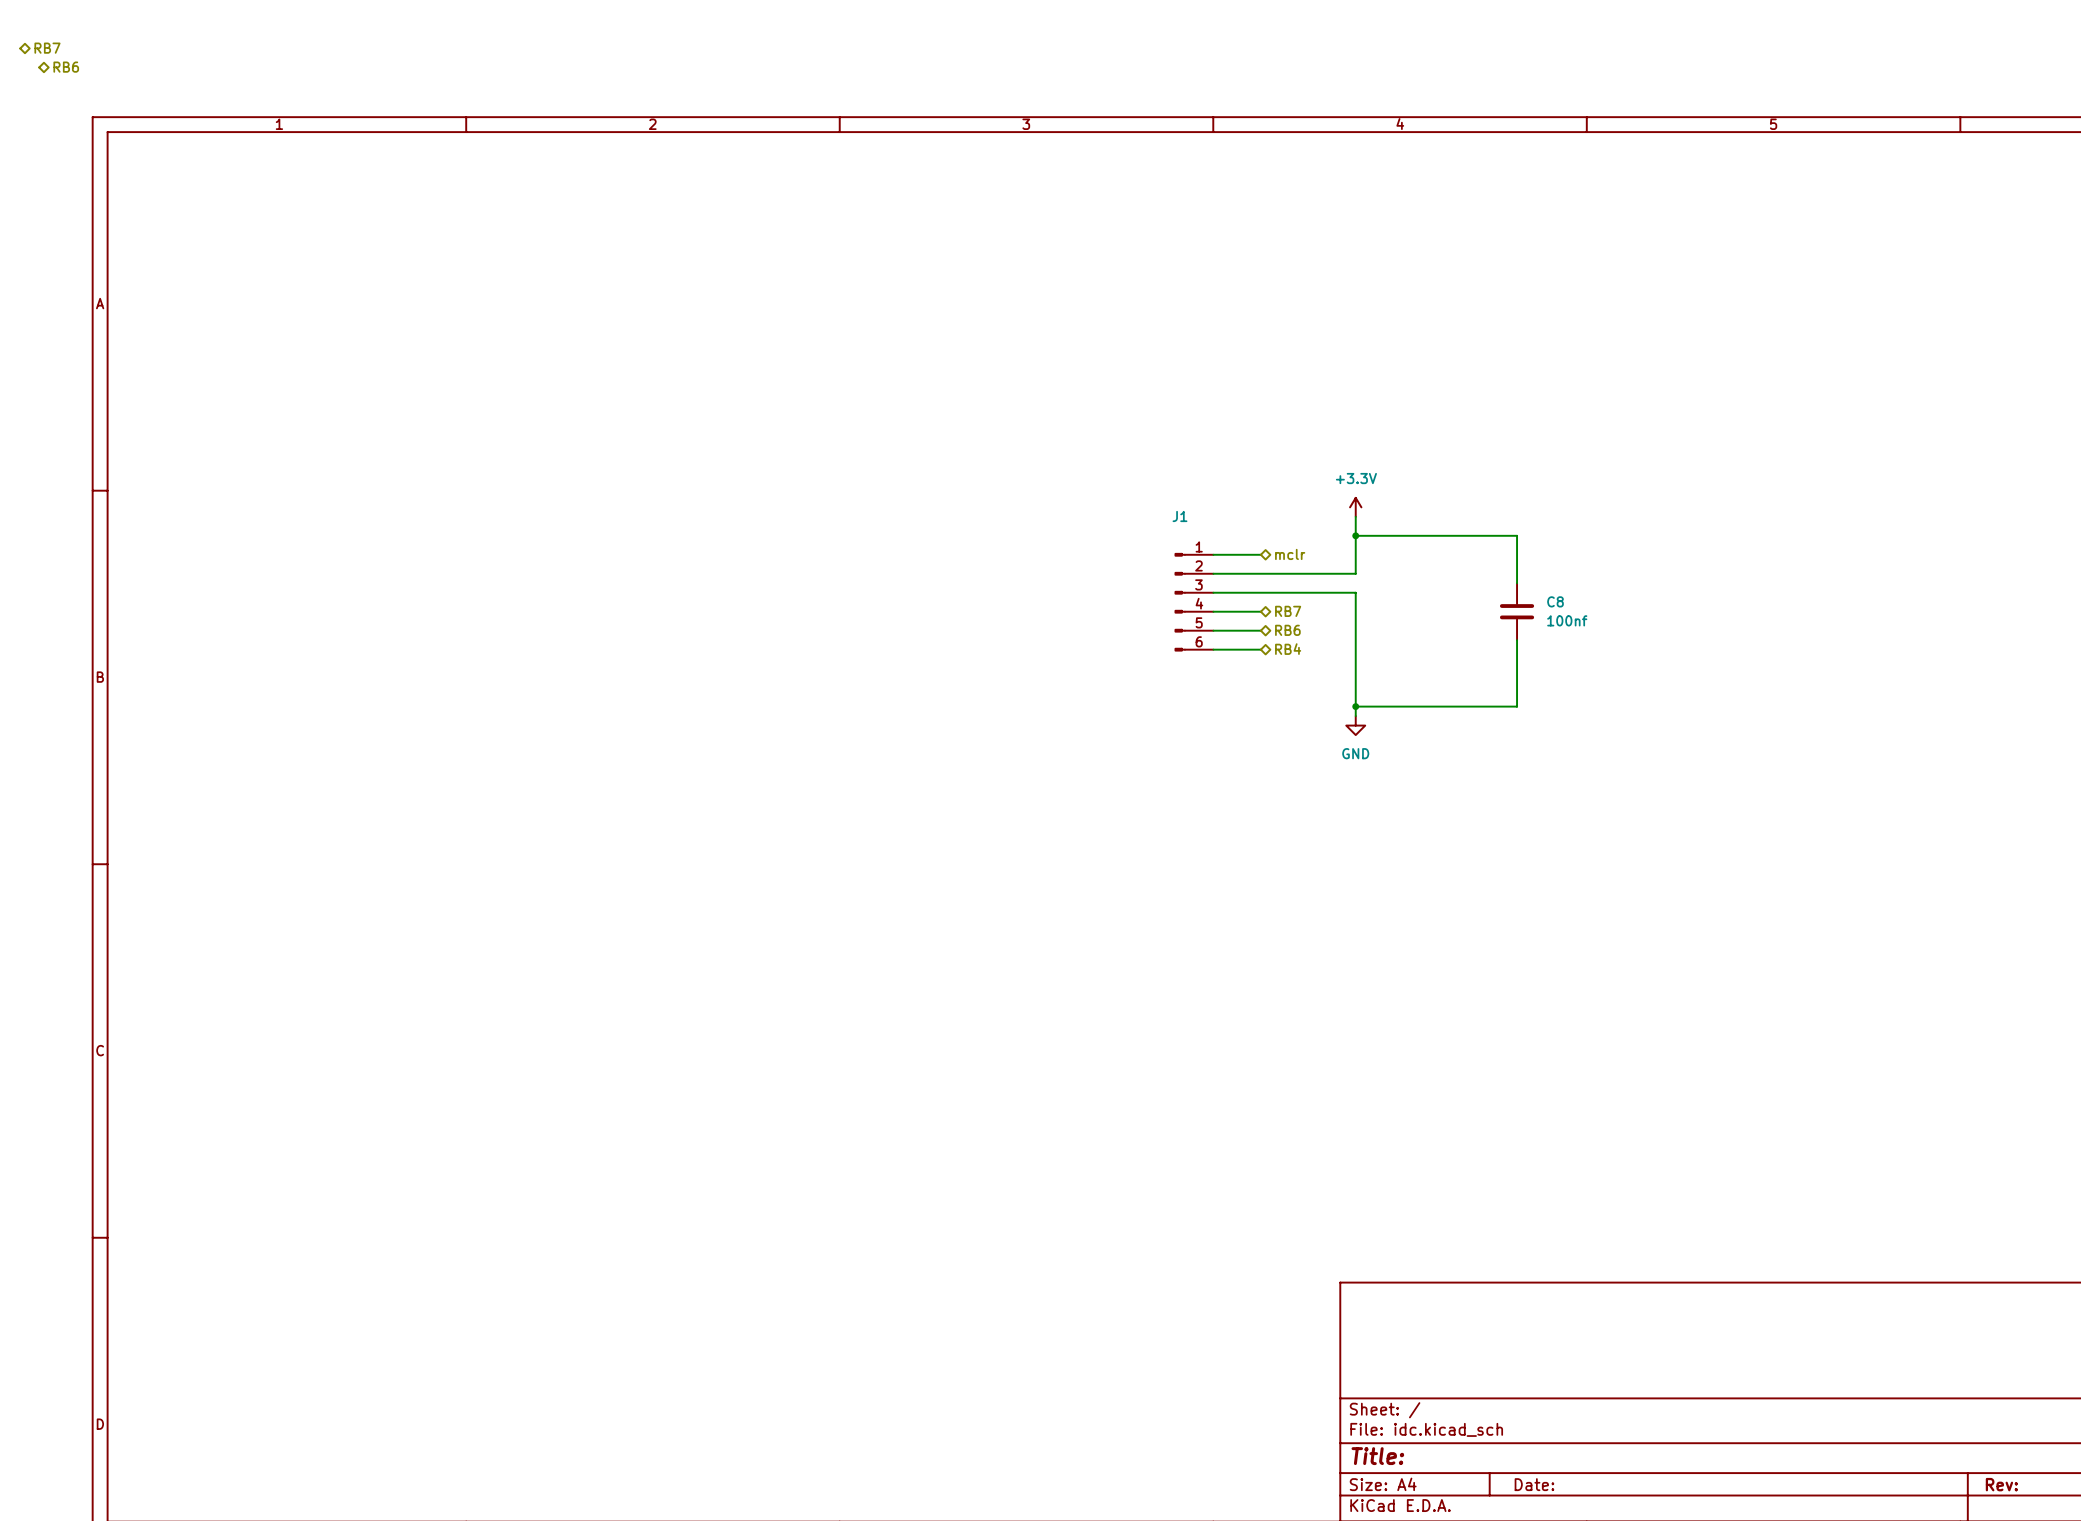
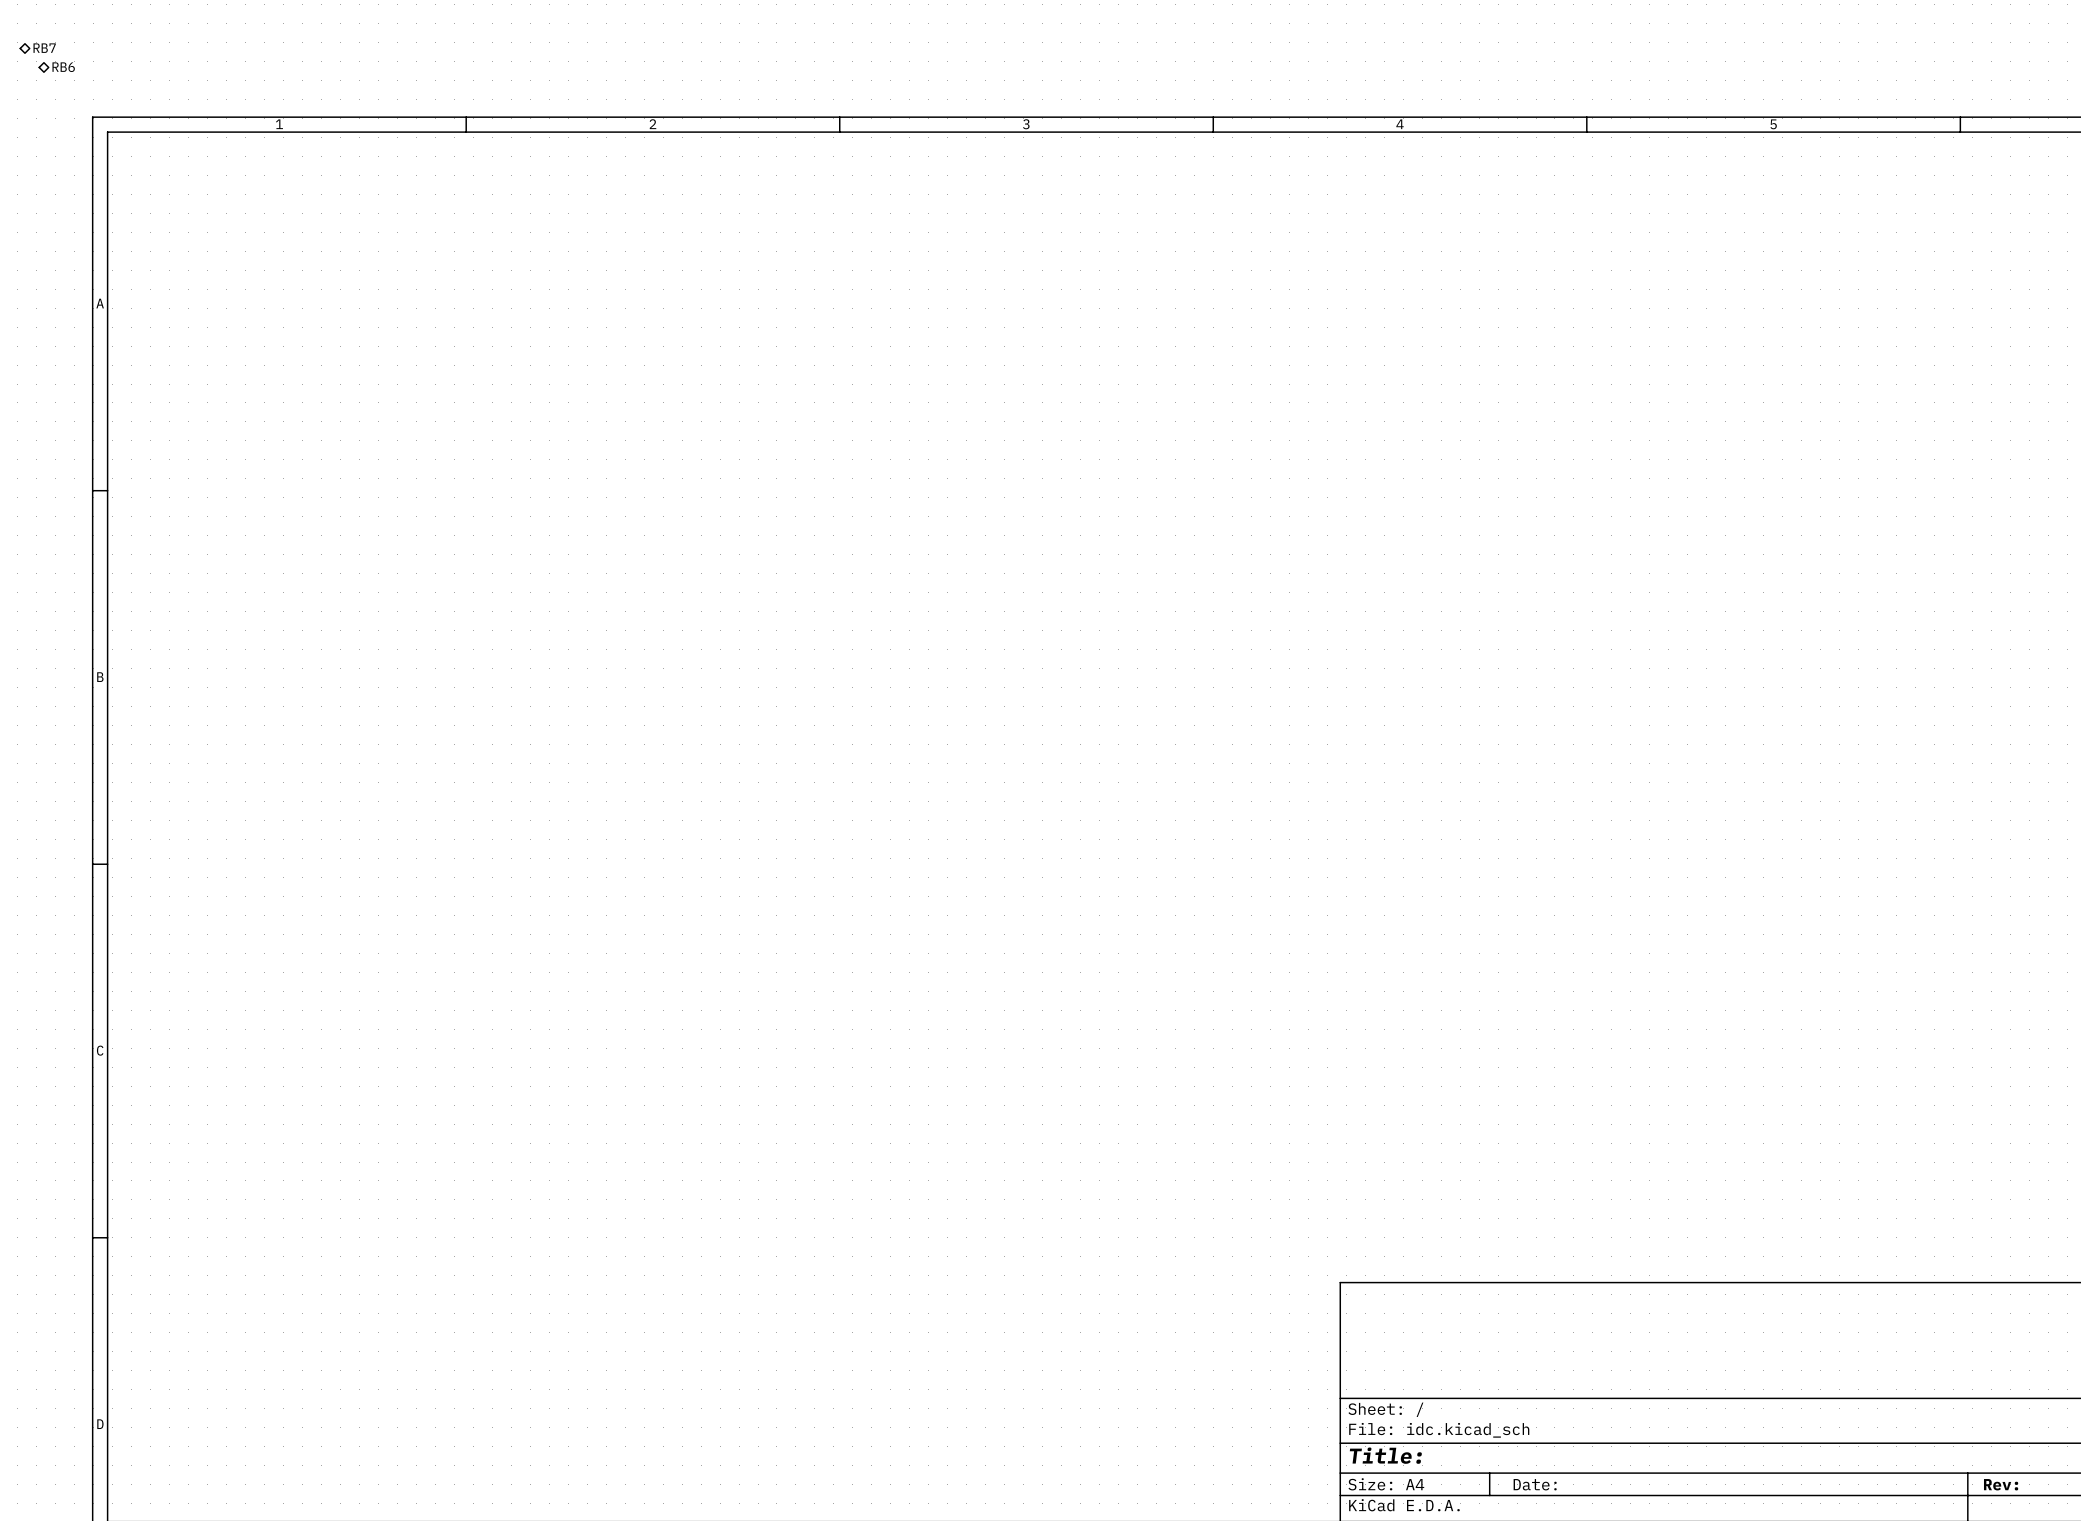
power symbol: +3.3V (1355, 507) -> none
wire: (1355, 516) (1355, 573) (1213, 573) -> none
wire: (1355, 535) (1517, 535) (1517, 583) -> none
junction: (1355, 535) -> none
wire: (1213, 554) (1260, 554) -> none
hierarchical label: mclr (1290, 554) -> none
wire: (1213, 592) (1355, 592) (1355, 716) -> none
J1: (1194, 602) -> none
wire: (1213, 611) (1260, 611) -> none
hierarchical label: RB7 (1288, 611) -> none
C8: 100nf (1517, 611) -> none
wire: (1213, 630) (1260, 630) -> none
hierarchical label: RB6 (1287, 630) -> none
wire: (1517, 640) (1517, 706) (1355, 706) -> none
wire: (1213, 649) (1260, 649) -> none
hierarchical label: RB4 (1288, 649) -> none
junction: (1355, 706) -> none
power symbol: GND (1355, 725) -> none

